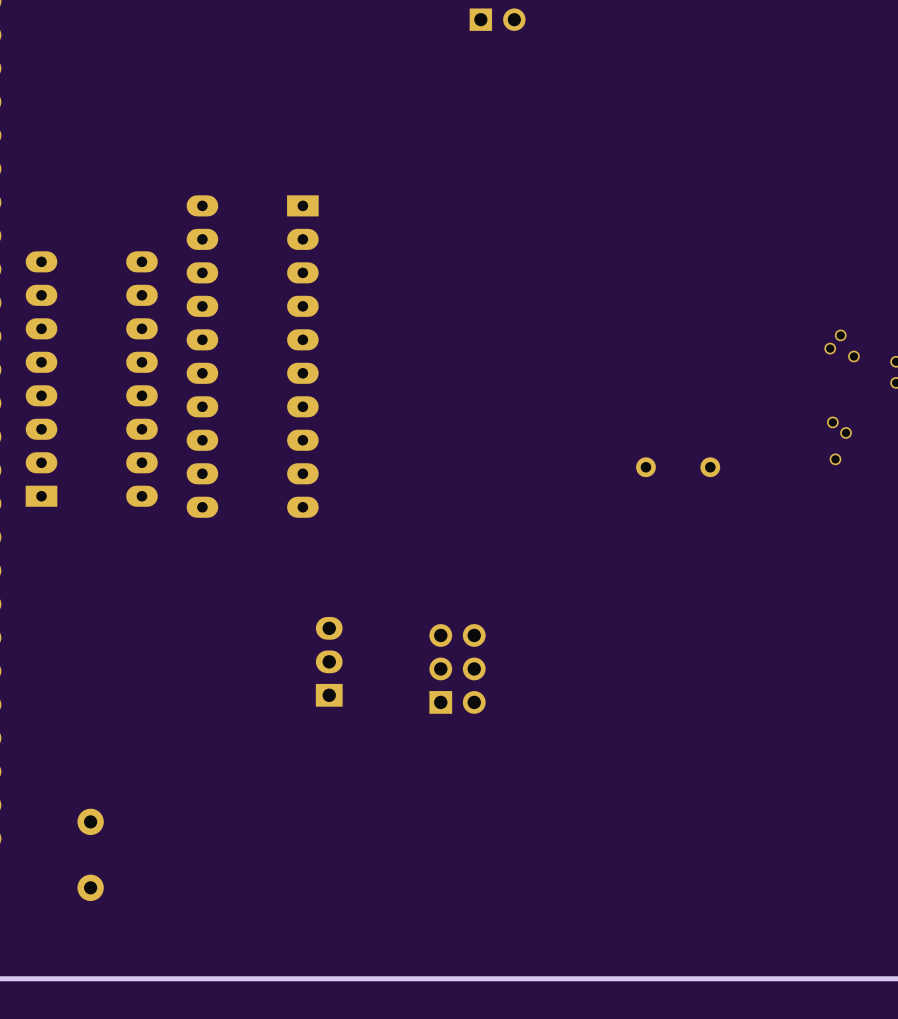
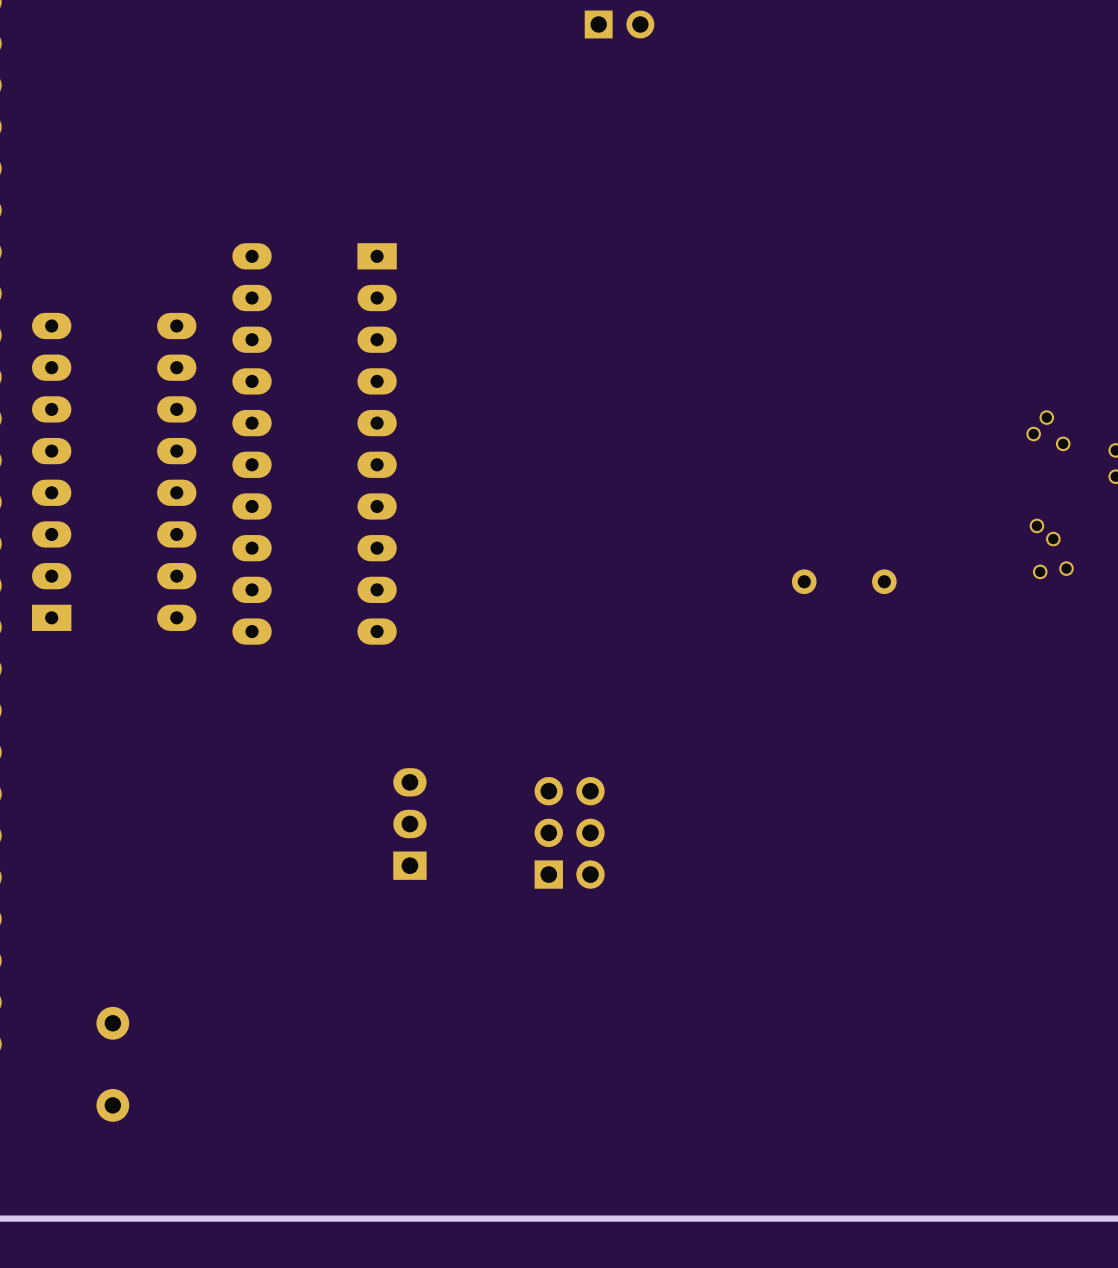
part: none -> (1066, 568)

